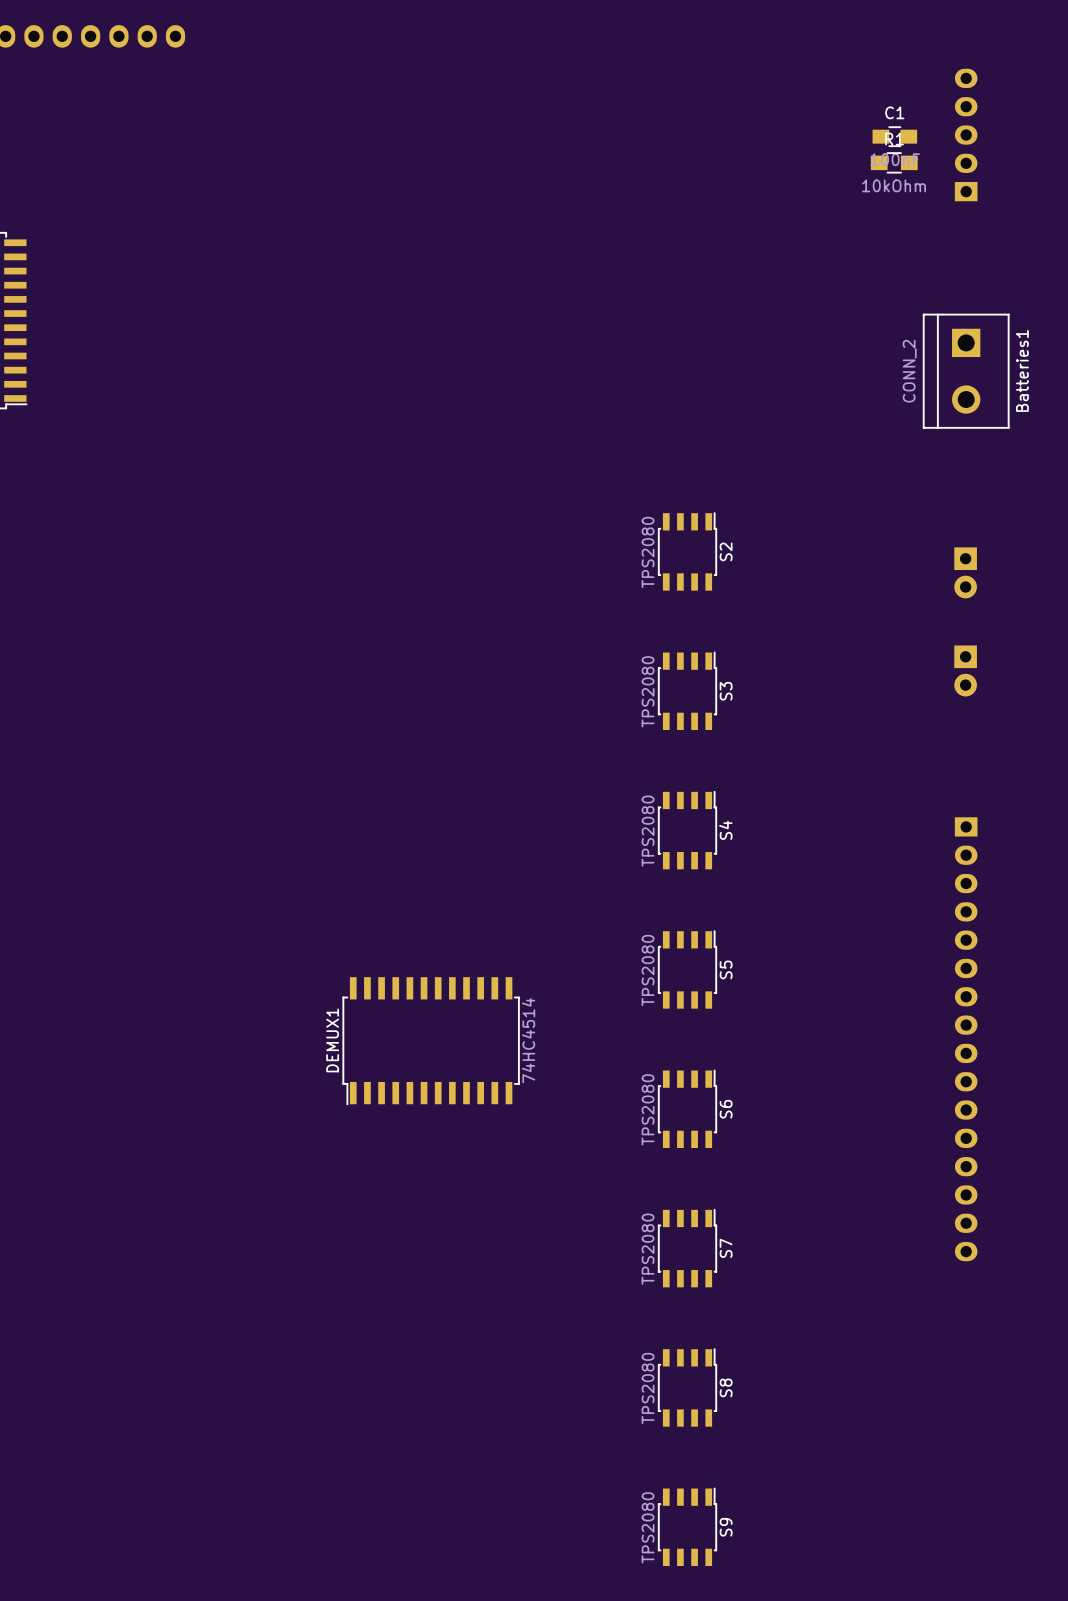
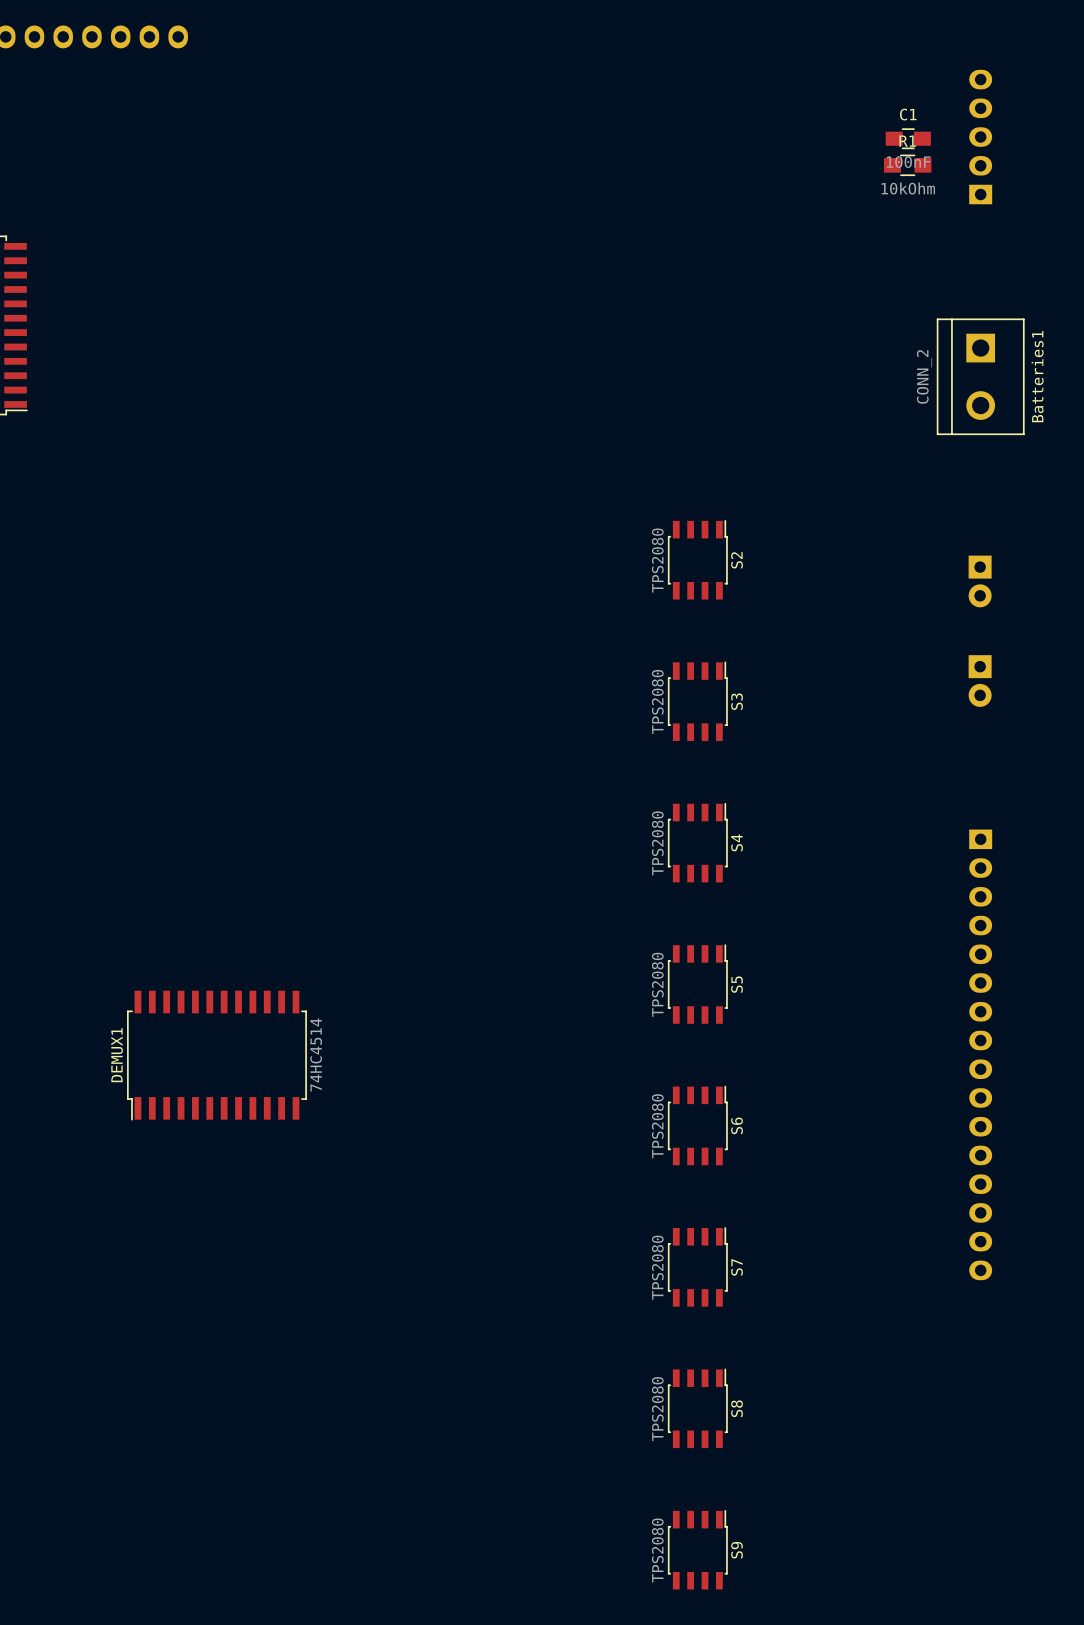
DEMUX1 position: (431, 1041) -> (216, 1055)

